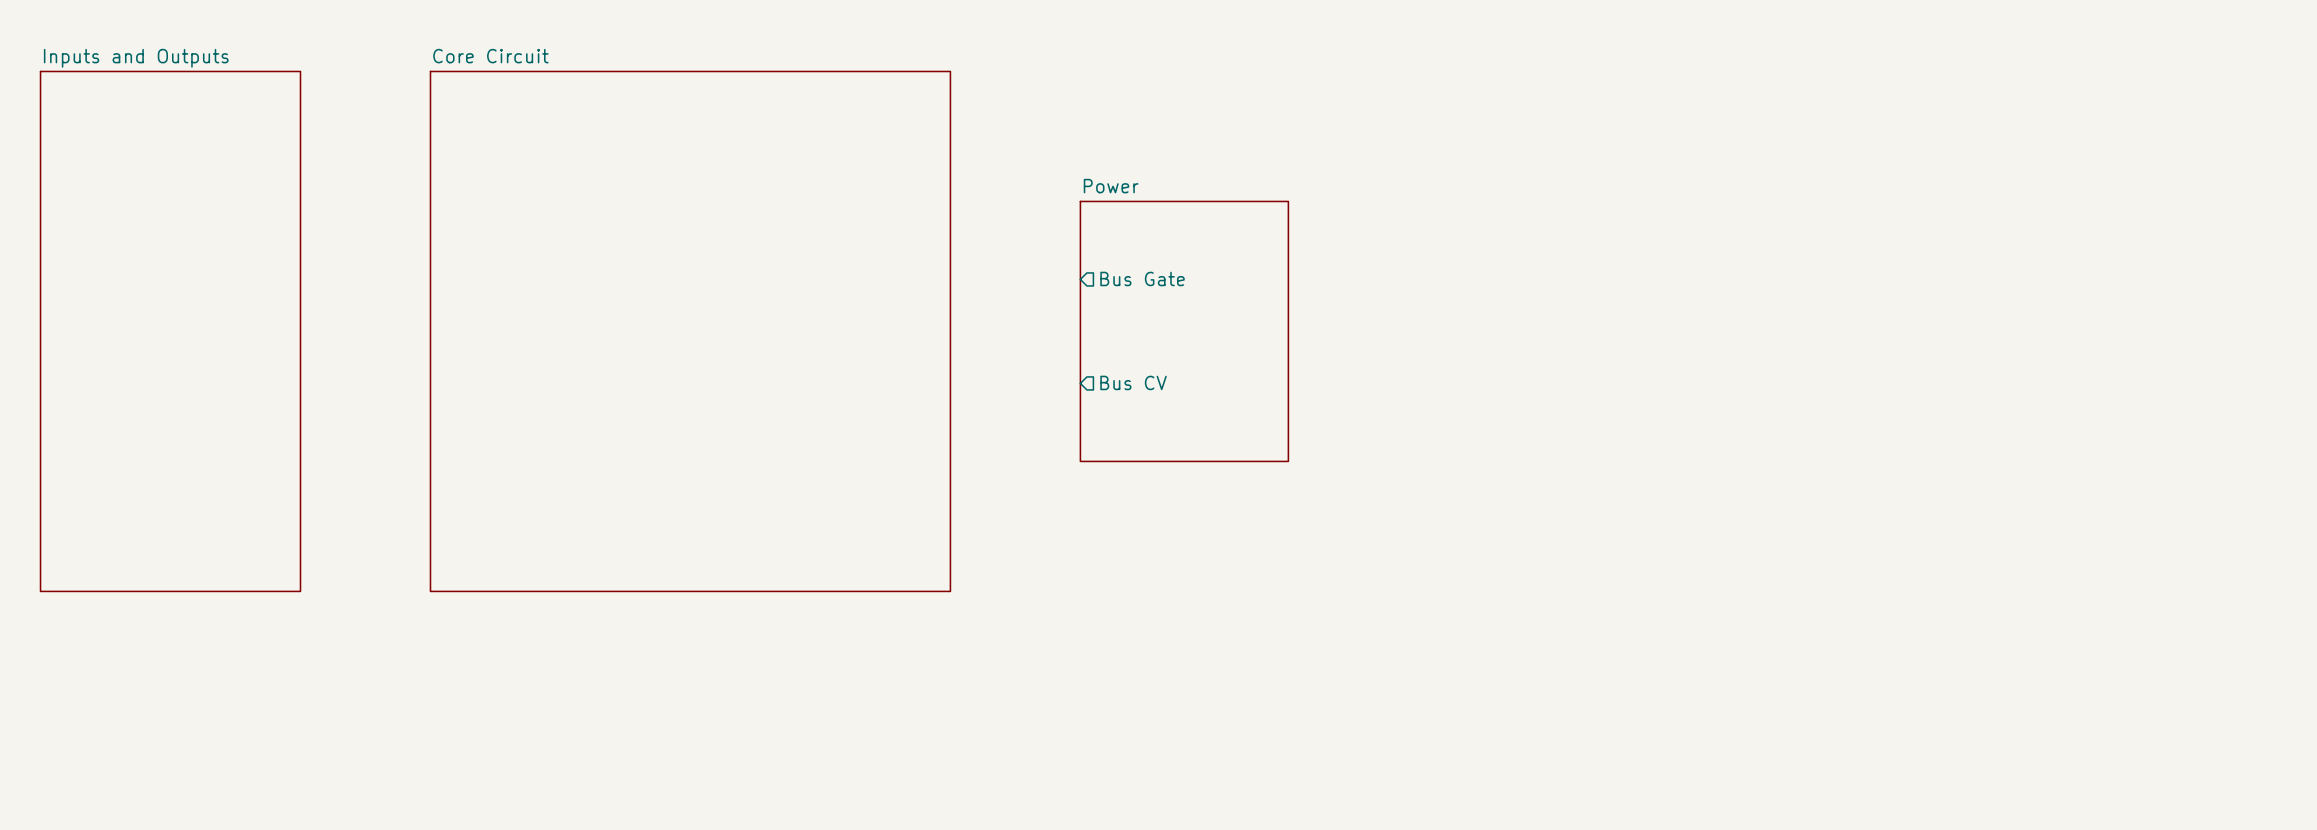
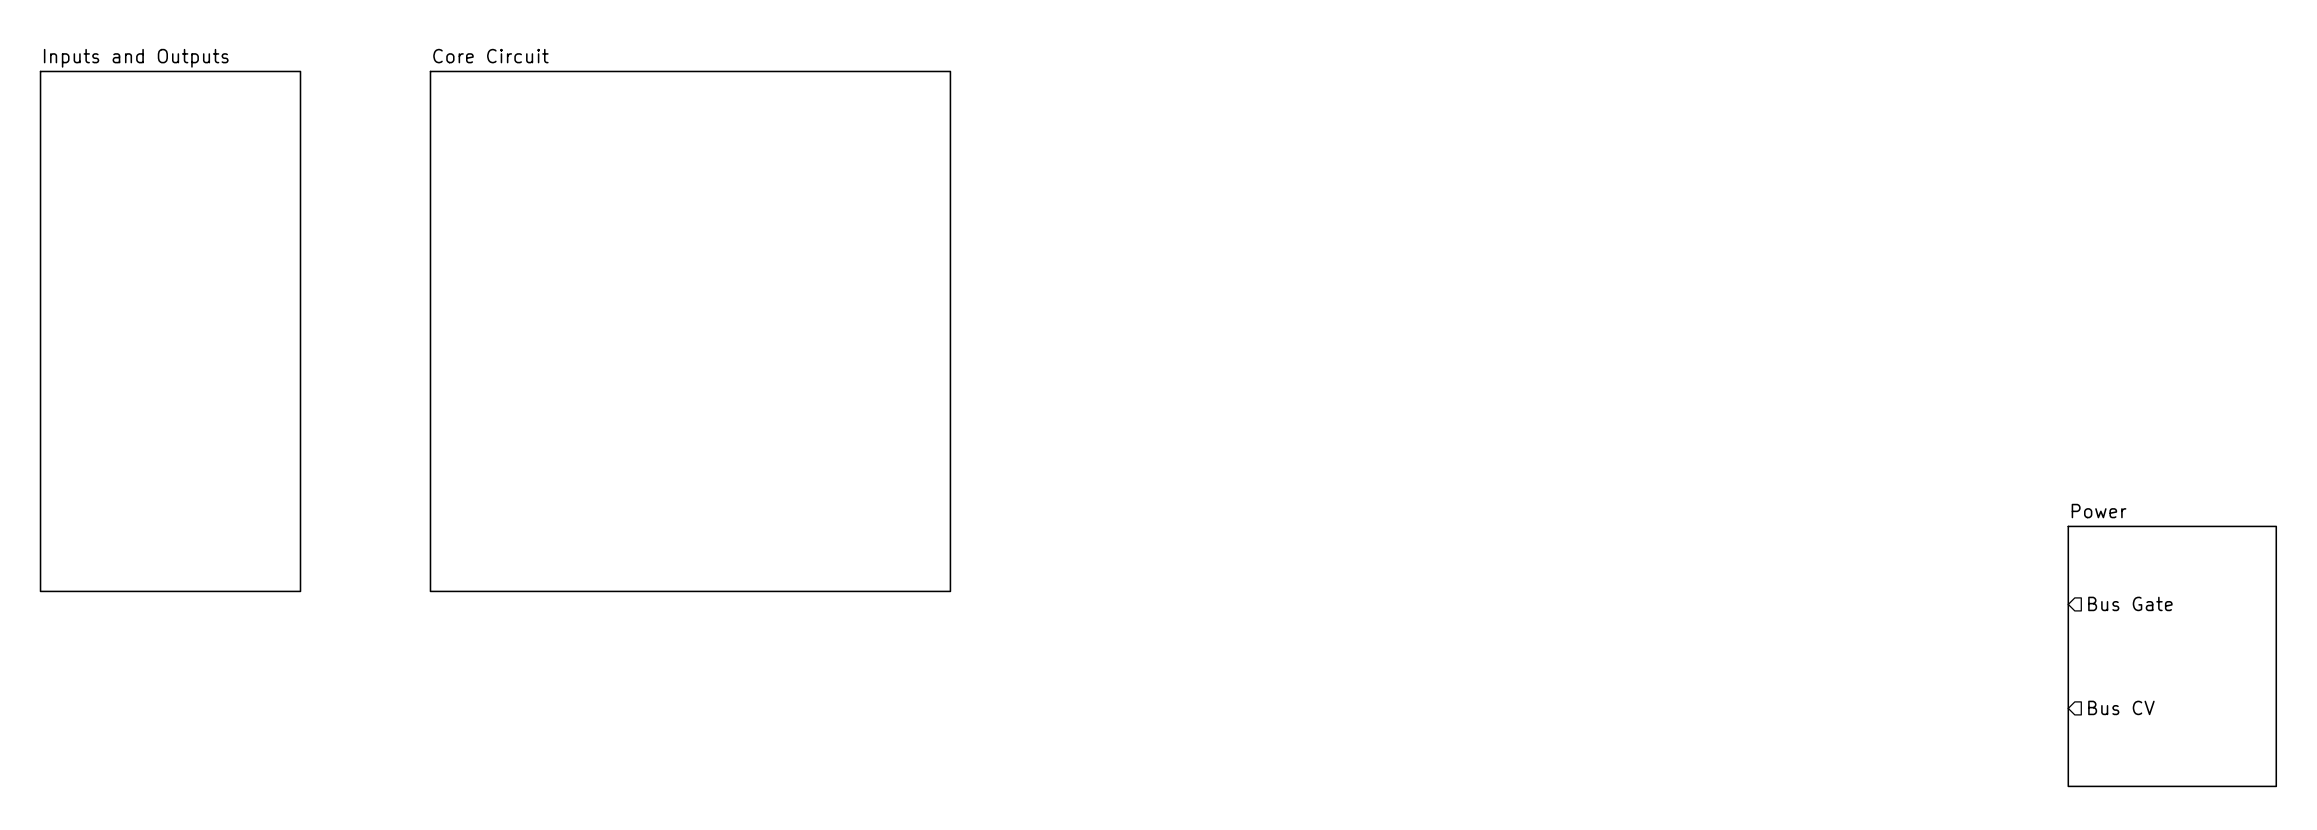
sheet pin: Bus Gate (1142, 278) -> none
sheet Power: (1184, 331) -> none
sheet pin: Bus CV (1133, 382) -> none
sheet pin: none -> Bus Gate (2130, 603)
sheet Power: none -> (2172, 656)
sheet pin: none -> Bus CV (2121, 707)

